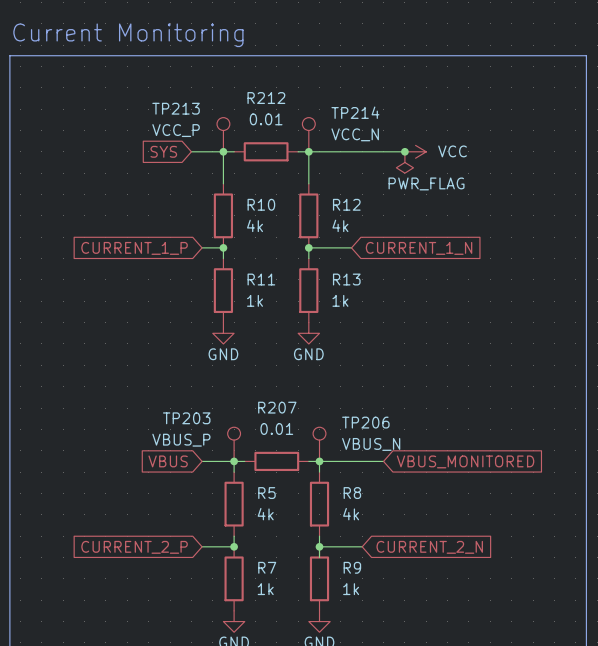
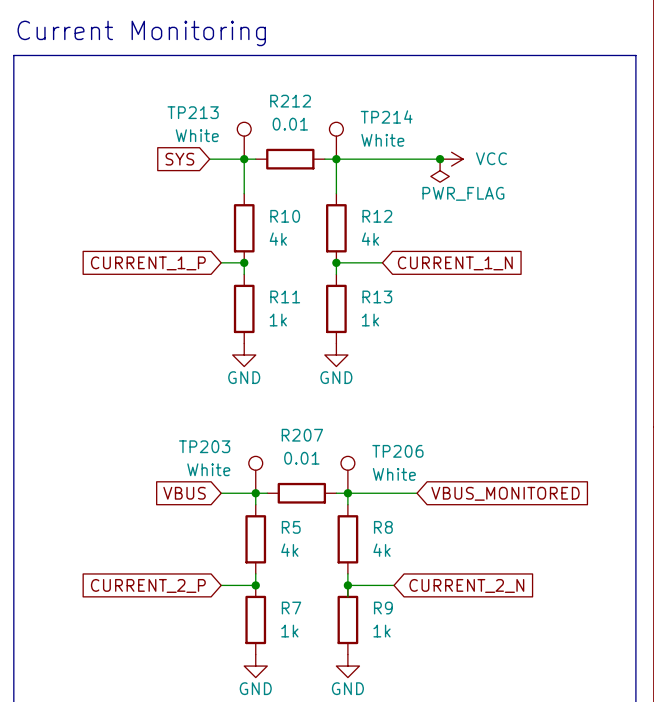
TP213 value: VCC_P (176, 130) -> White (197, 135)
TP214 value: VCC_N (355, 134) -> White (382, 140)
TP203 value: VBUS_P (181, 440) -> White (208, 469)
TP206 value: VBUS_N (371, 444) -> White (394, 474)

